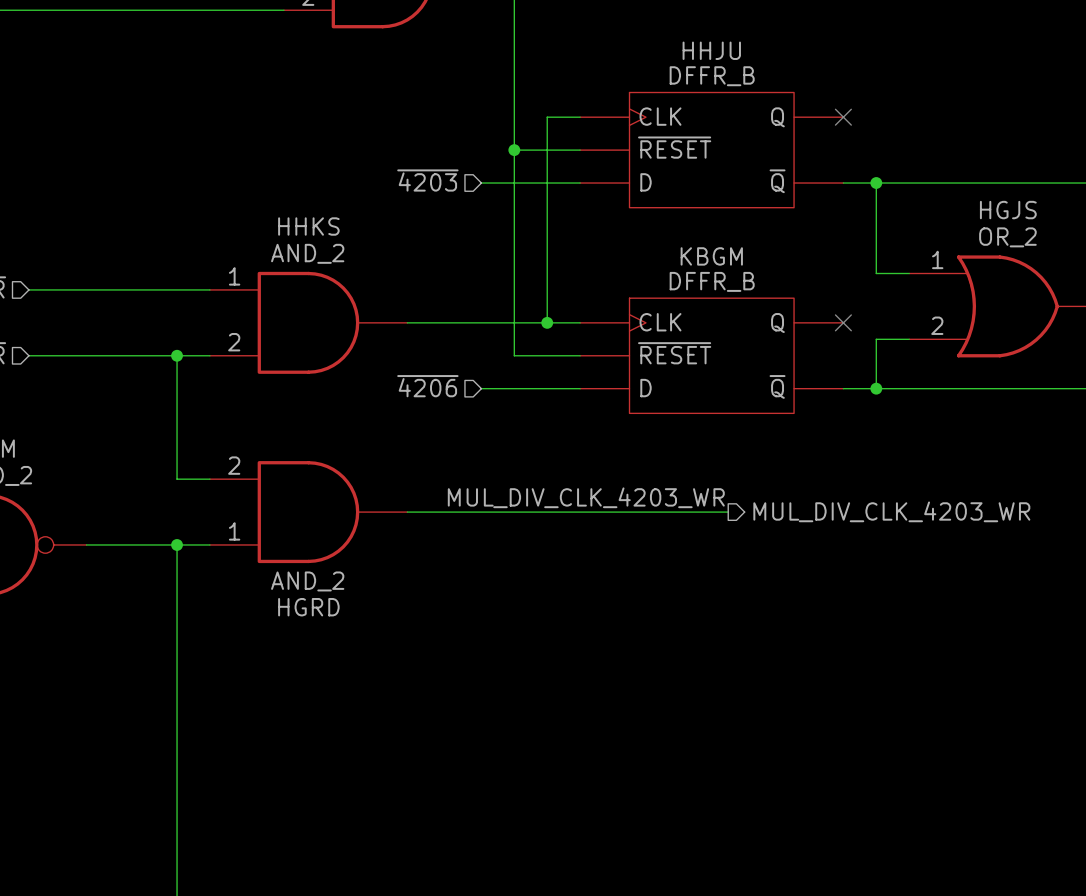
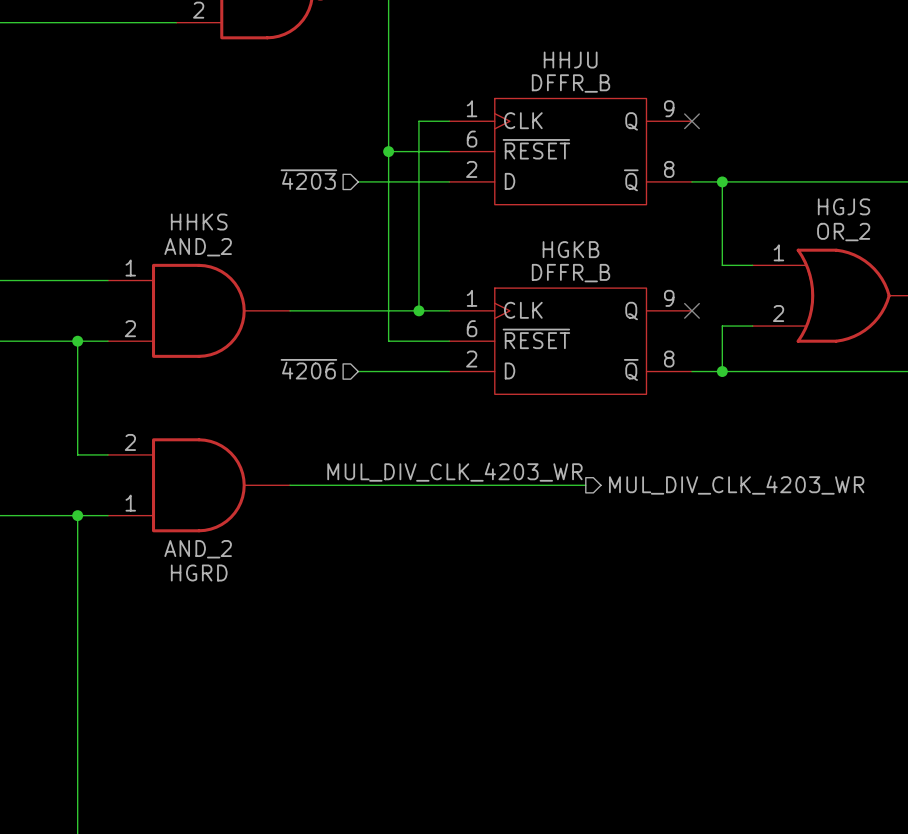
HHJU pin number: none -> 1 (472, 108)
HHJU pin number: none -> 9 (669, 108)
HHJU pin number: none -> 6 (472, 139)
HHJU pin number: none -> 2 (471, 169)
HHJU pin number: none -> 8 (669, 169)
KBGM name: KBGM (711, 256) -> HGKB (571, 249)
KBGM pin number: none -> 1 (472, 298)
KBGM pin number: none -> 9 (669, 298)
KBGM pin number: none -> 6 (472, 328)
KBGM pin number: none -> 2 (471, 359)
KBGM pin number: none -> 8 (669, 359)

